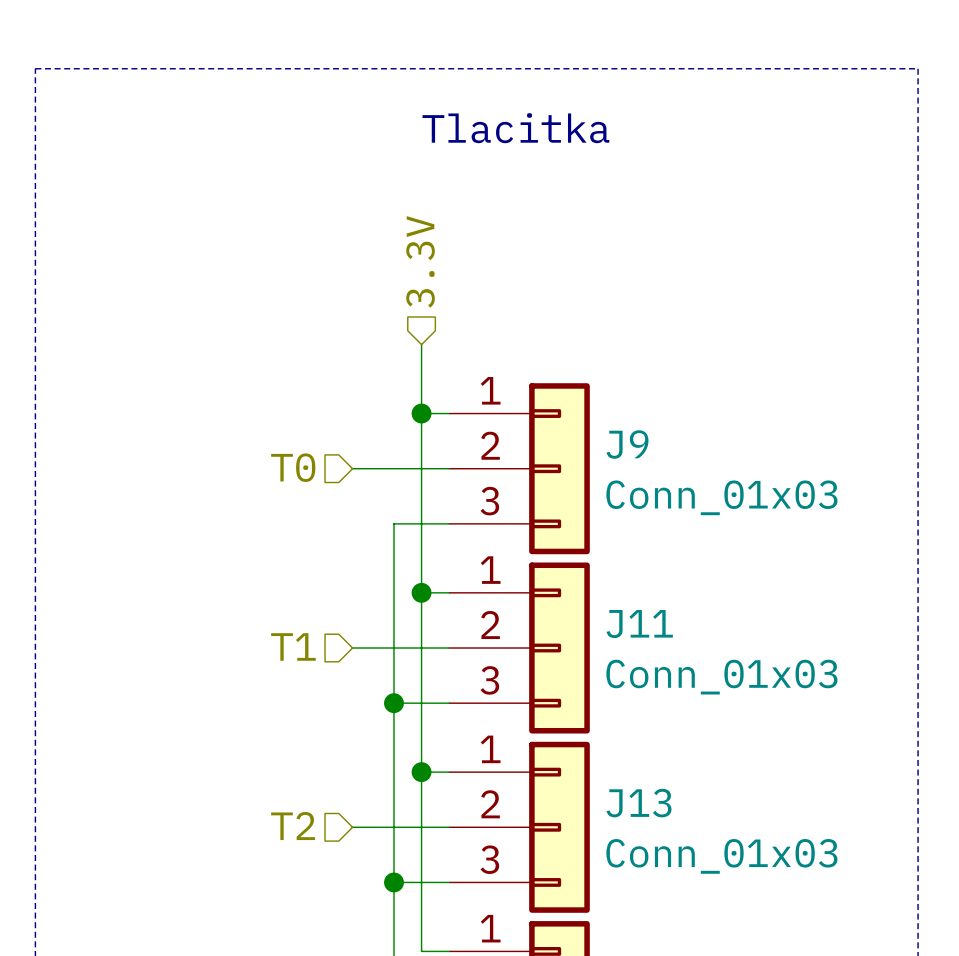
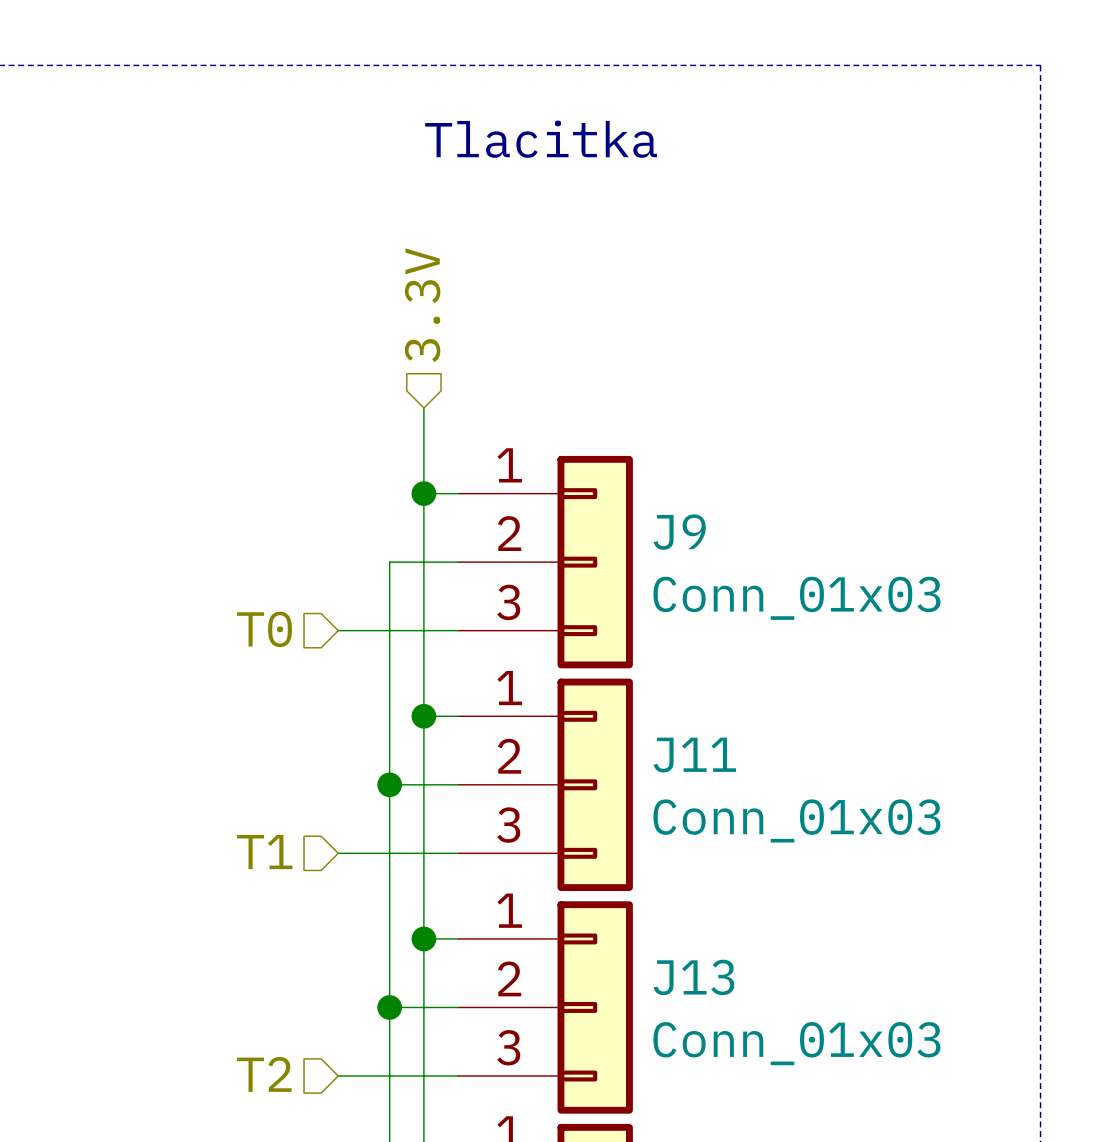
hierarchical label position: T0 (293, 467) -> T0 (264, 629)
wire: (352, 468) (393, 468) -> (338, 630) (389, 630) (389, 562)
hierarchical label position: T1 (293, 646) -> T1 (264, 852)
wire: (352, 648) (393, 648) -> (338, 853) (389, 853)
junction position: (393, 703) -> (389, 784)
hierarchical label position: T2 (293, 826) -> T2 (264, 1074)
wire: (352, 827) (393, 827) -> (338, 1075) (389, 1075)
junction position: (393, 882) -> (389, 1007)

